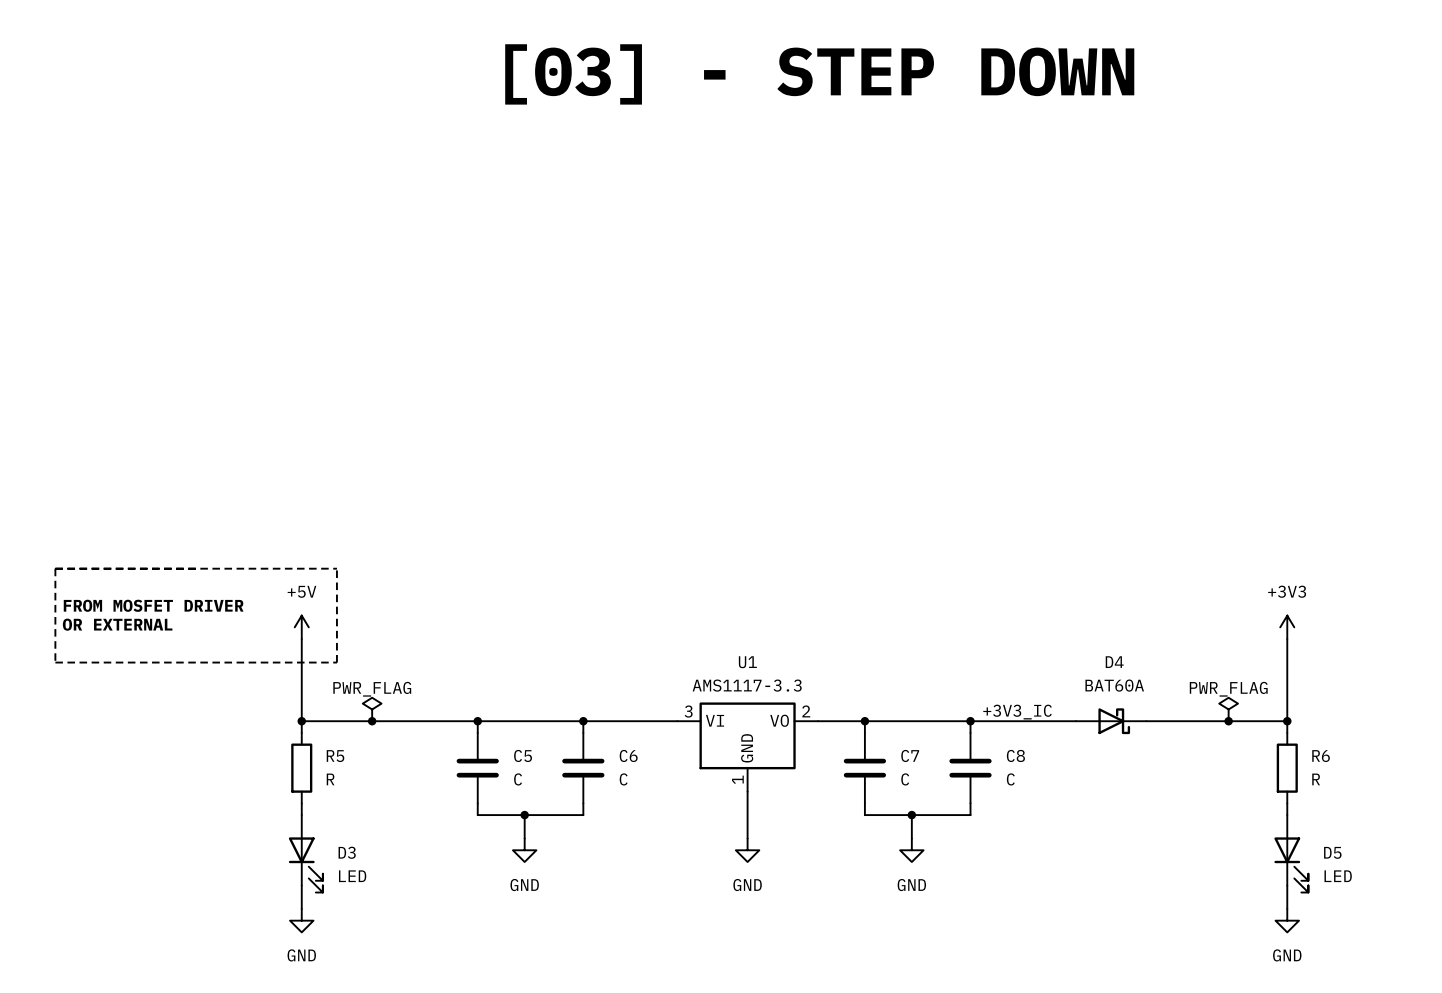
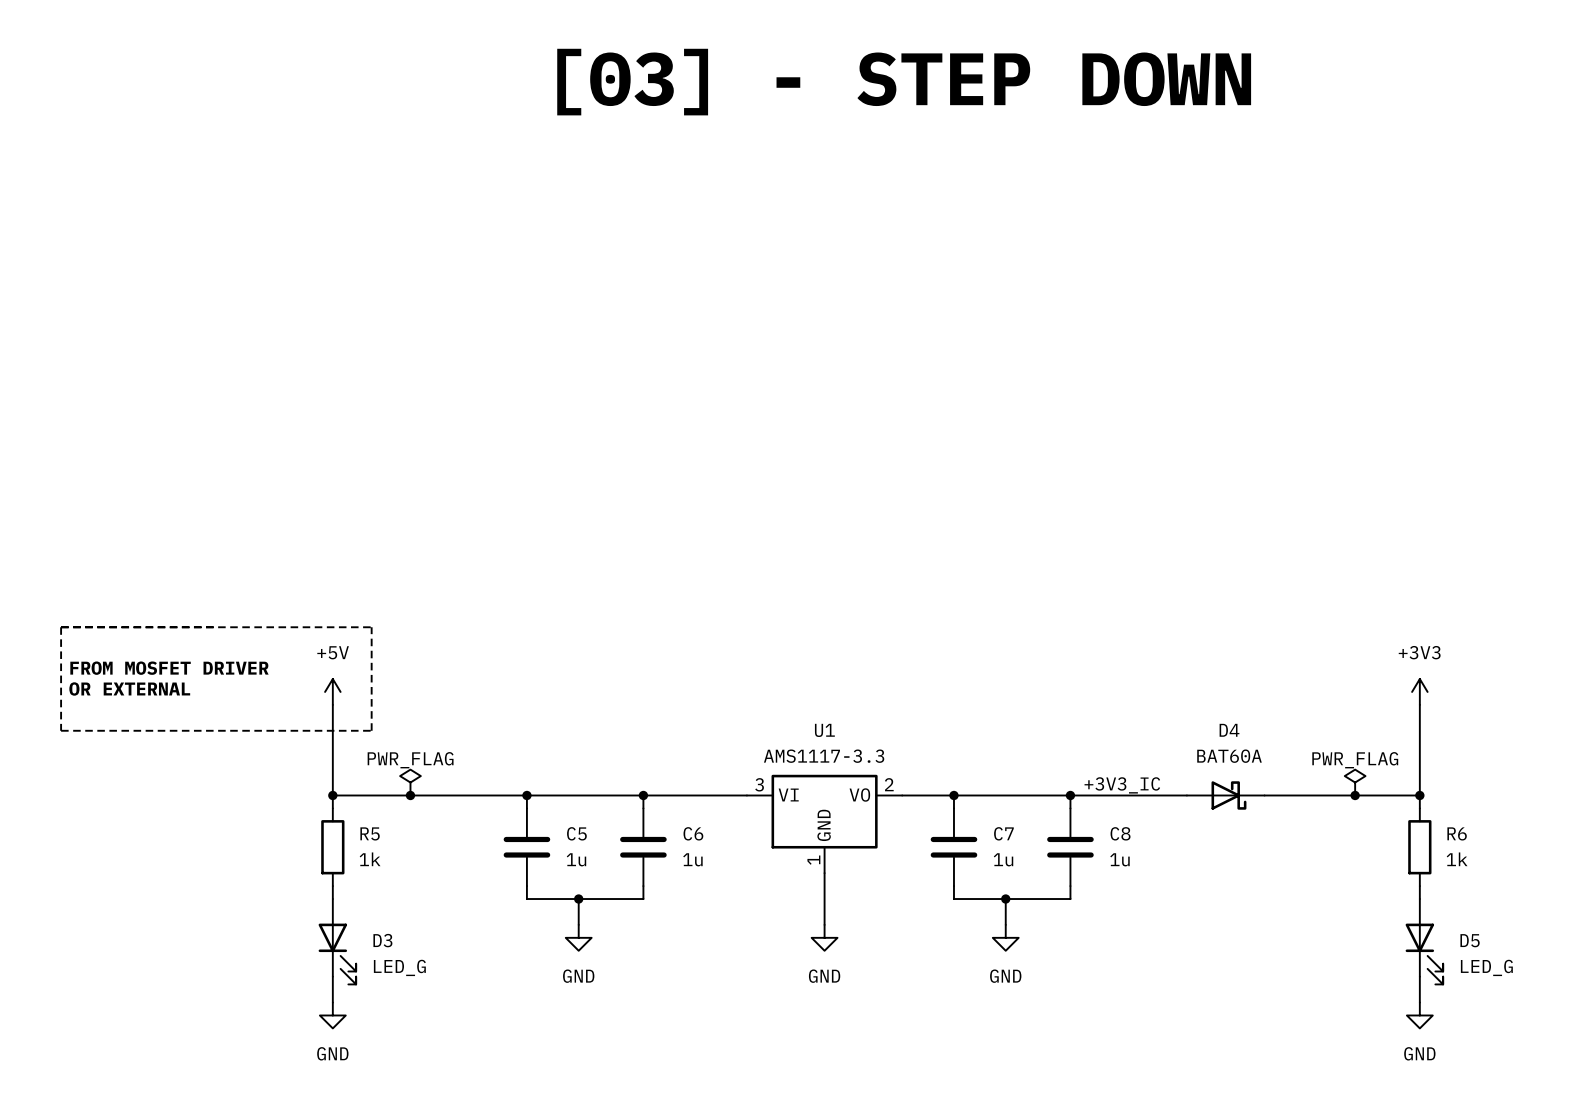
R5 value: R (330, 779) -> 1k (370, 859)
C5 value: C (518, 779) -> 1u (576, 859)
C6 value: C (623, 779) -> 1u (692, 859)
C7 value: C (905, 779) -> 1u (1003, 859)
C8 value: C (1010, 779) -> 1u (1119, 859)
R6 value: R (1316, 779) -> 1k (1457, 859)
D3 value: LED (352, 876) -> LED_G (399, 967)
D5 value: LED (1338, 876) -> LED_G (1486, 967)

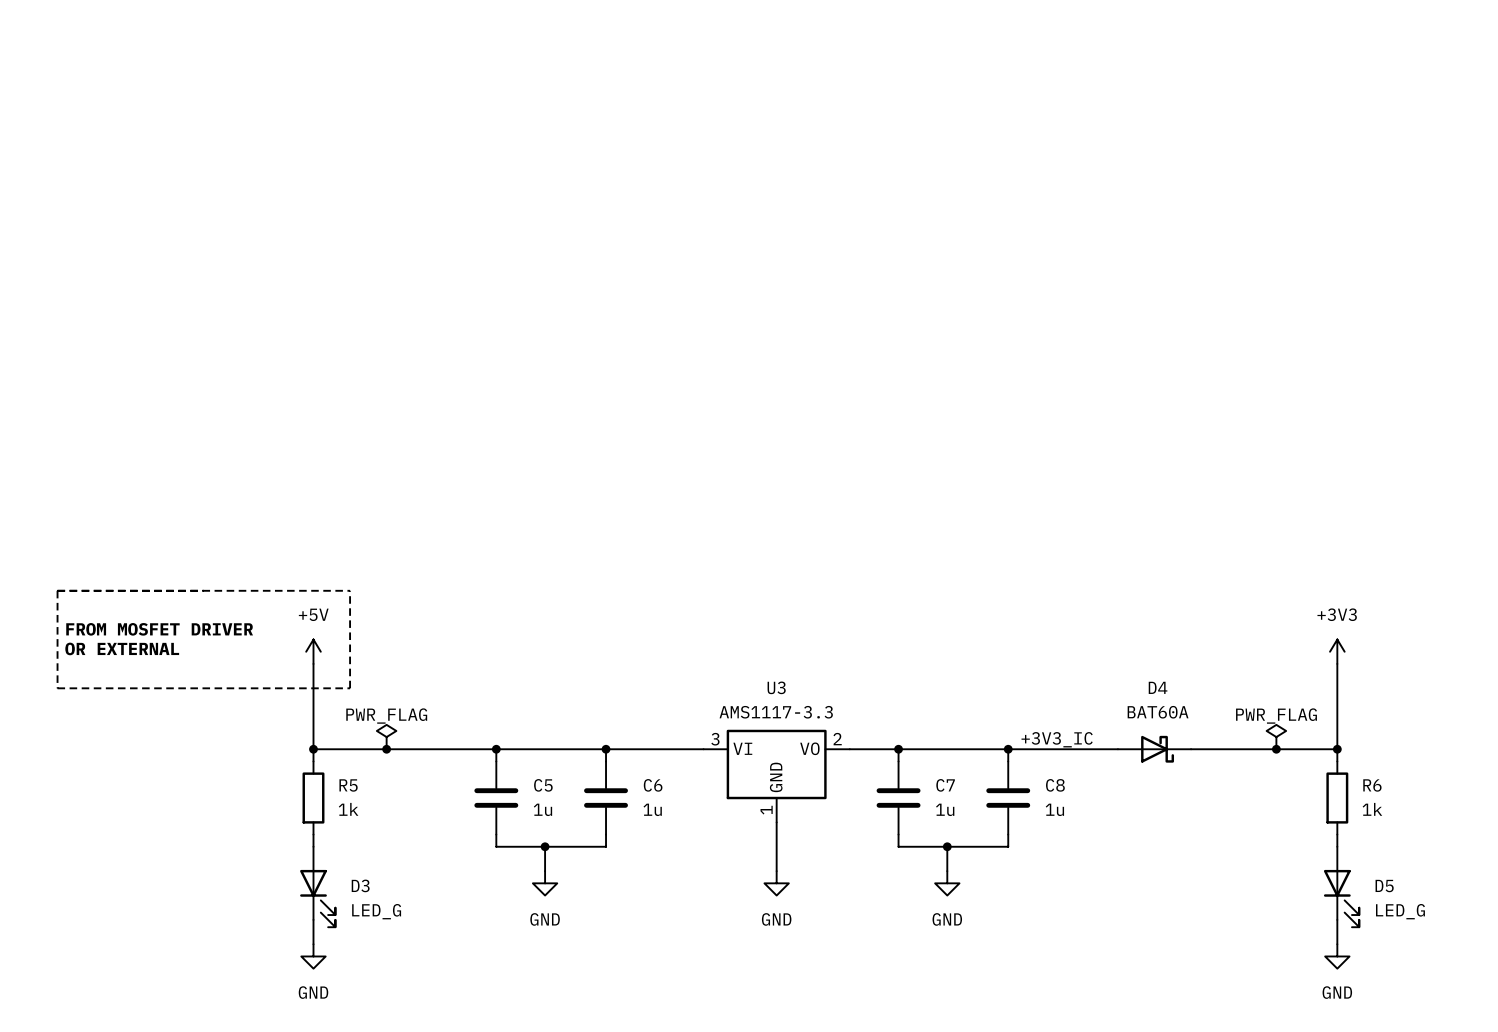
text: [03] - STEP DOWN (904, 82) -> none
U1 name: U1 (824, 730) -> U3 (776, 687)

